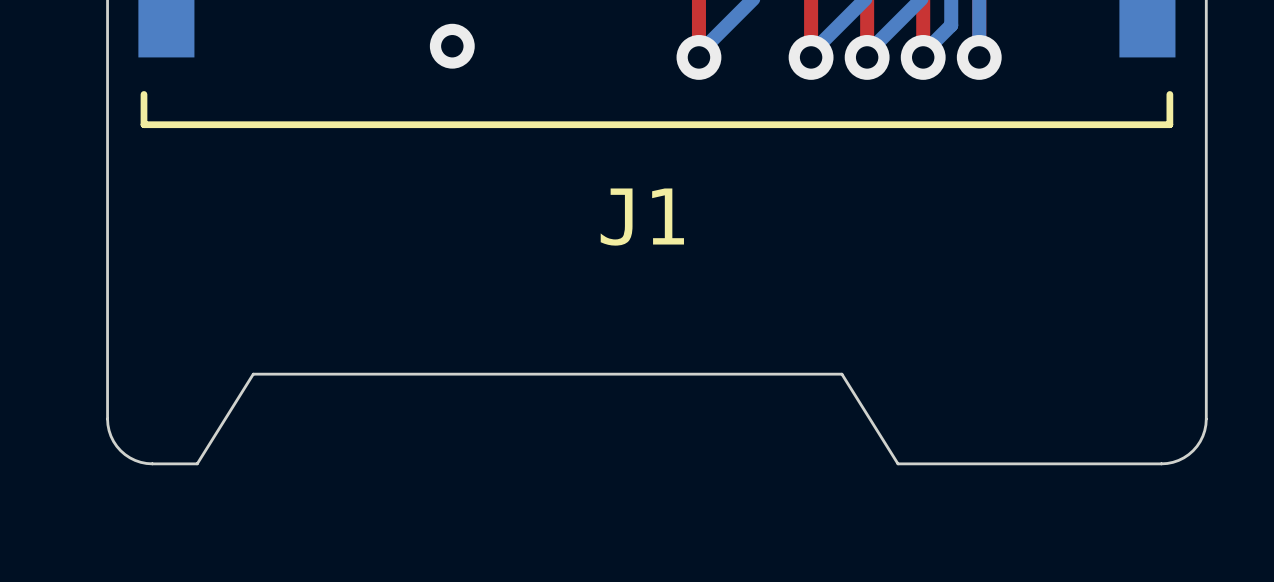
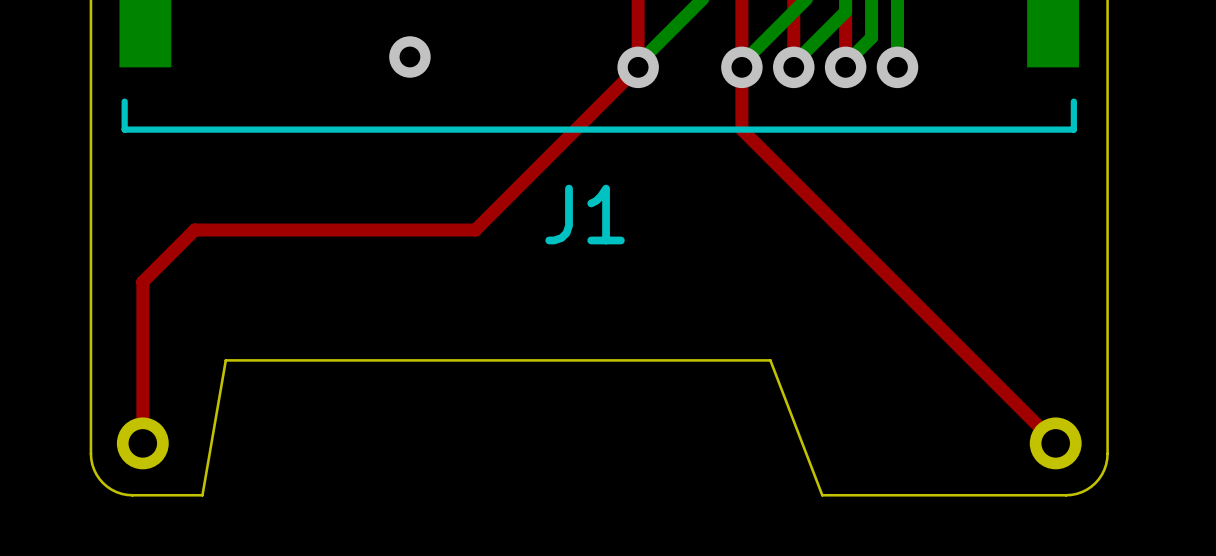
top track: none -> (638, 67) (475, 230) (194, 230) (142, 281) (142, 443)
top track: none -> (741, 67) (741, 129) (1055, 443)
board edge: (253, 374) (197, 463) (146, 463) (129, 457) (120, 450) (113, 441) (109, 430) (107, 419) -> (225, 360) (202, 495) (127, 494) (107, 486) (96, 474) (91, 459) (90, 401)
board edge: (841, 374) (897, 463) (1167, 463) (1178, 460) (1193, 450) (1202, 436) (1206, 419) -> (770, 360) (822, 495) (1076, 493) (1095, 483) (1106, 464) (1107, 401)
part: none -> (142, 443)
part: none -> (1055, 443)

